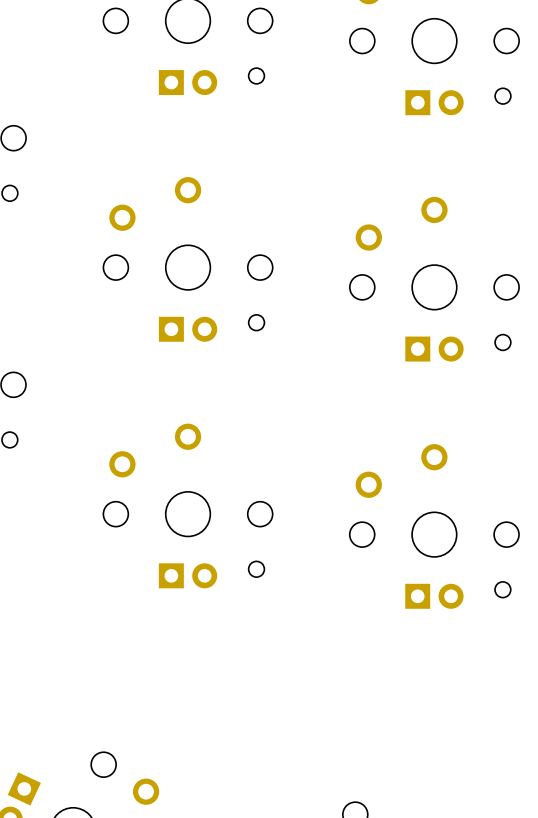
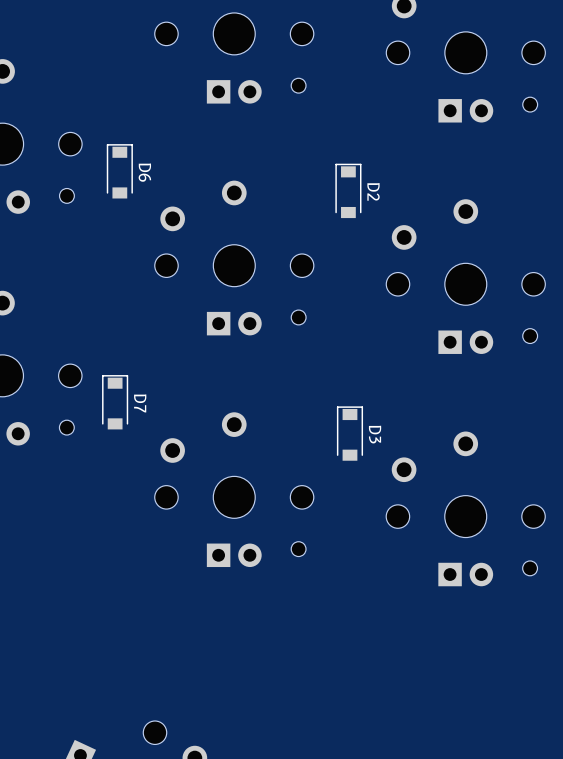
D6: none -> (119, 171)
D2: none -> (348, 190)
D7: none -> (115, 402)
D3: none -> (349, 433)

